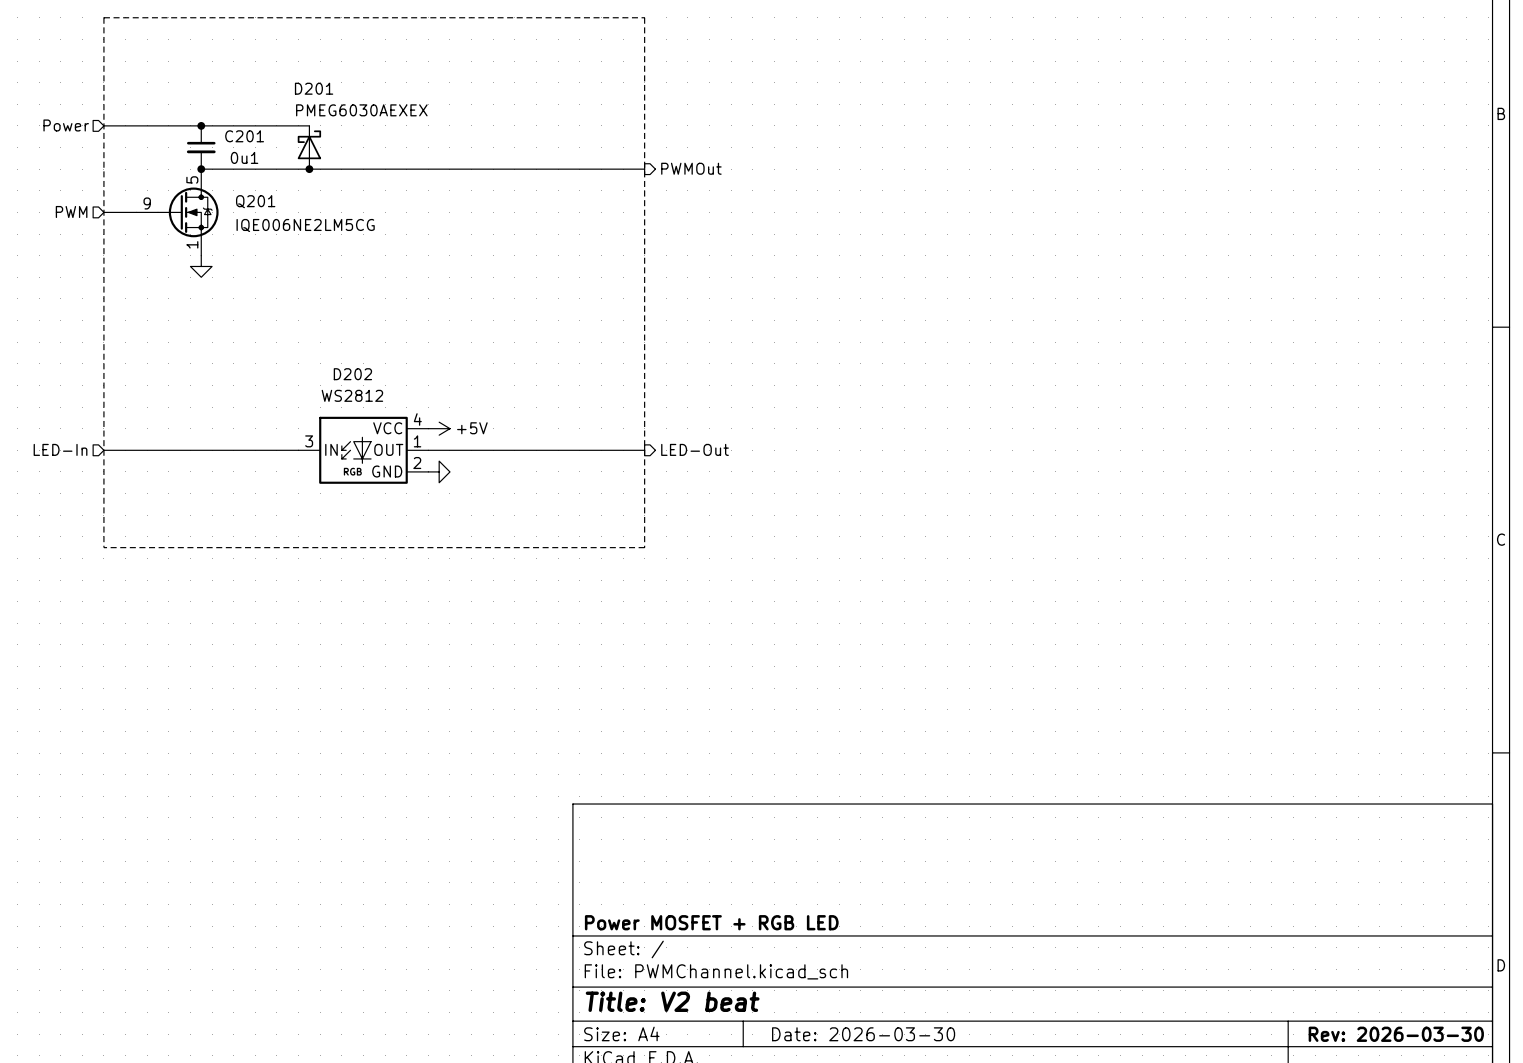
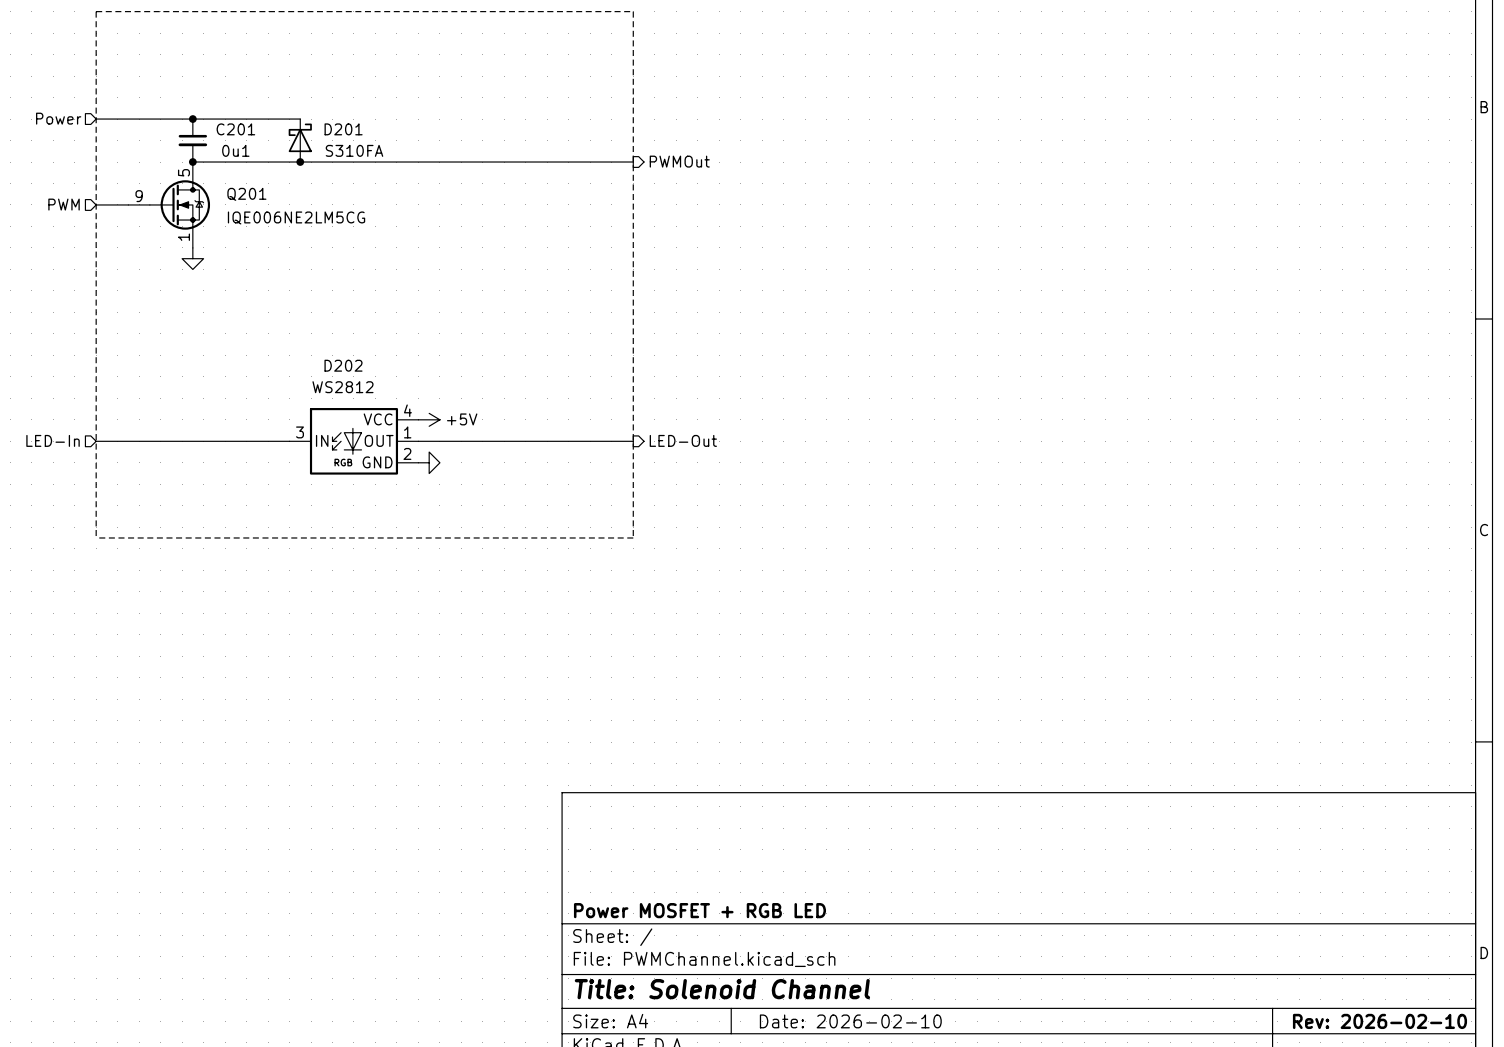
D201 name position: D201 (314, 88) -> D201 (343, 129)
D201 value: PMEG6030AEXEX (361, 110) -> S310FA (354, 150)
title block: Title: V2 beat (672, 1001) -> Title: Solenoid Channel (722, 989)
title block: Date: 2026-03-30 (863, 1034) -> Date: 2026-02-10 (850, 1021)
title block: Rev: 2026-03-30 (1396, 1034) -> Rev: 2026-02-10 (1379, 1021)

